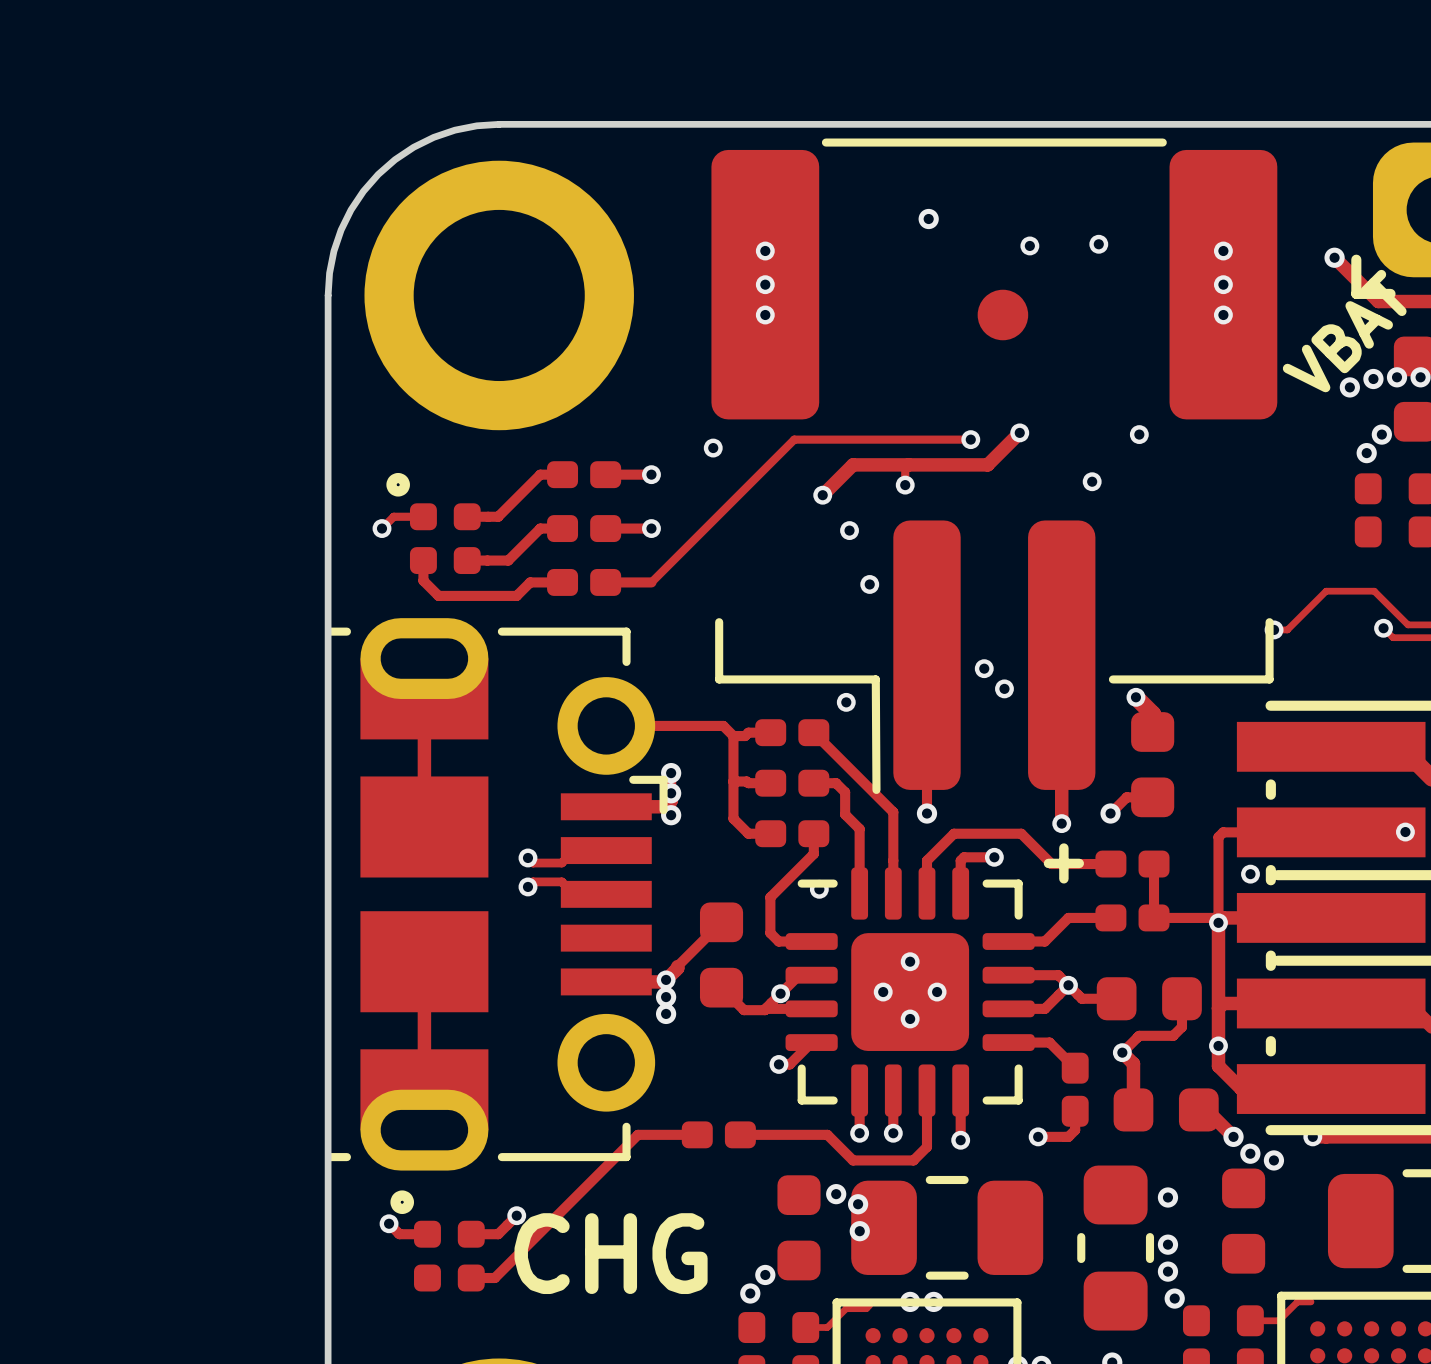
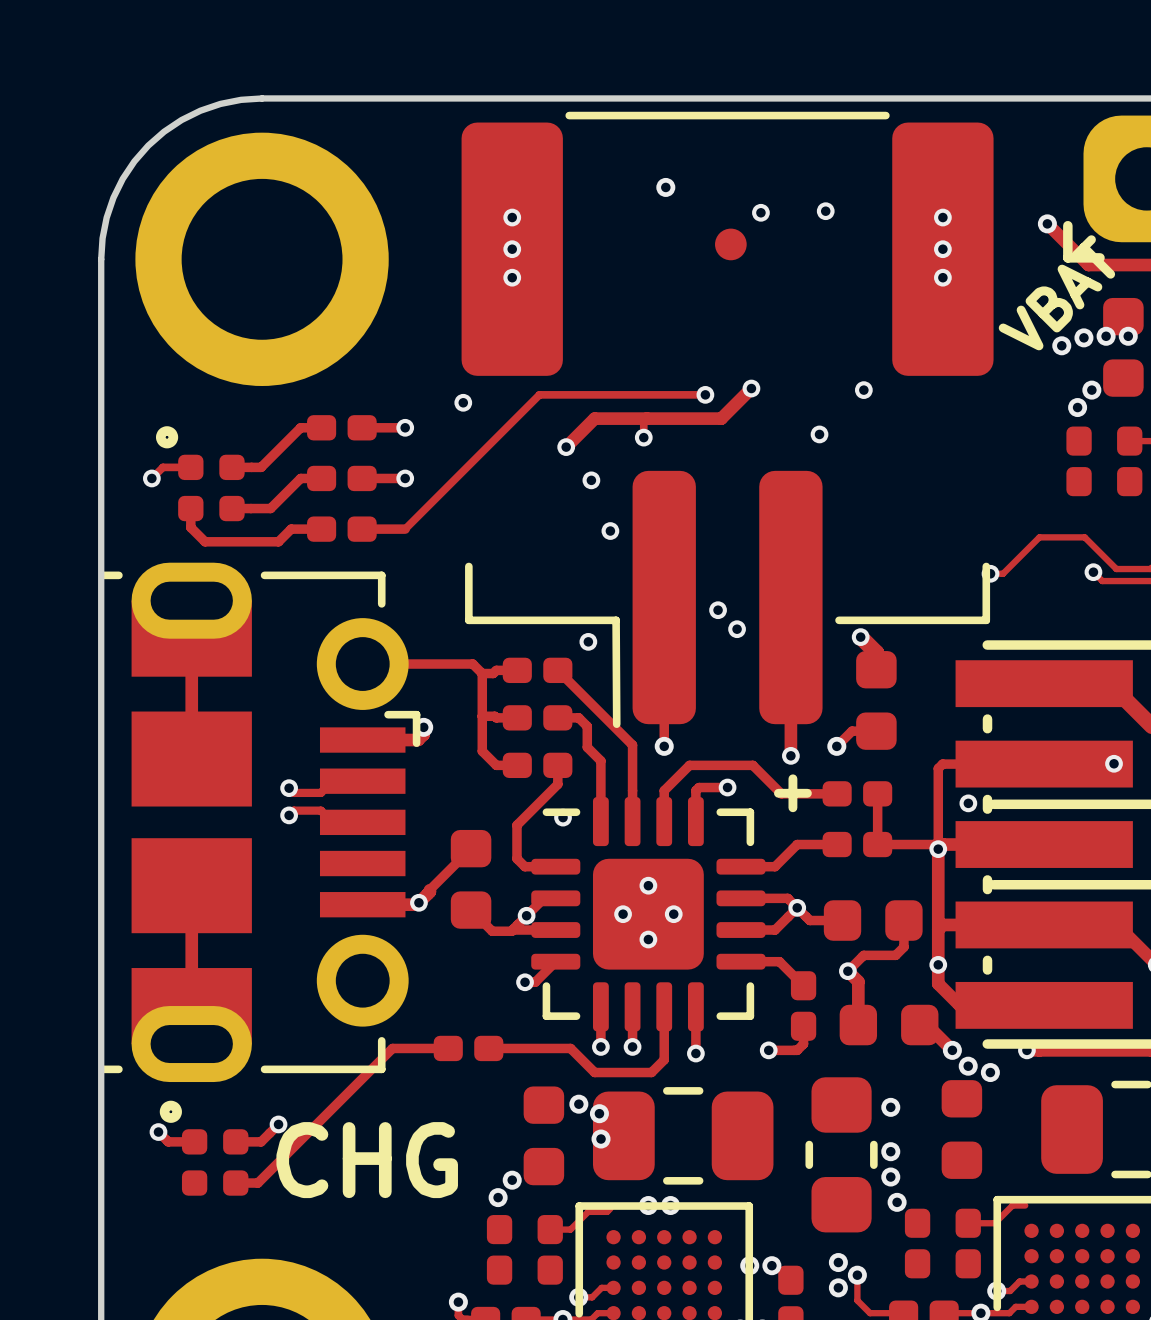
part footprint: [977, 289, 1029, 341] -> [715, 228, 747, 261]
via: (671, 773) -> none
via: (671, 815) -> none
via: (666, 997) -> none
via: (666, 1013) -> none

